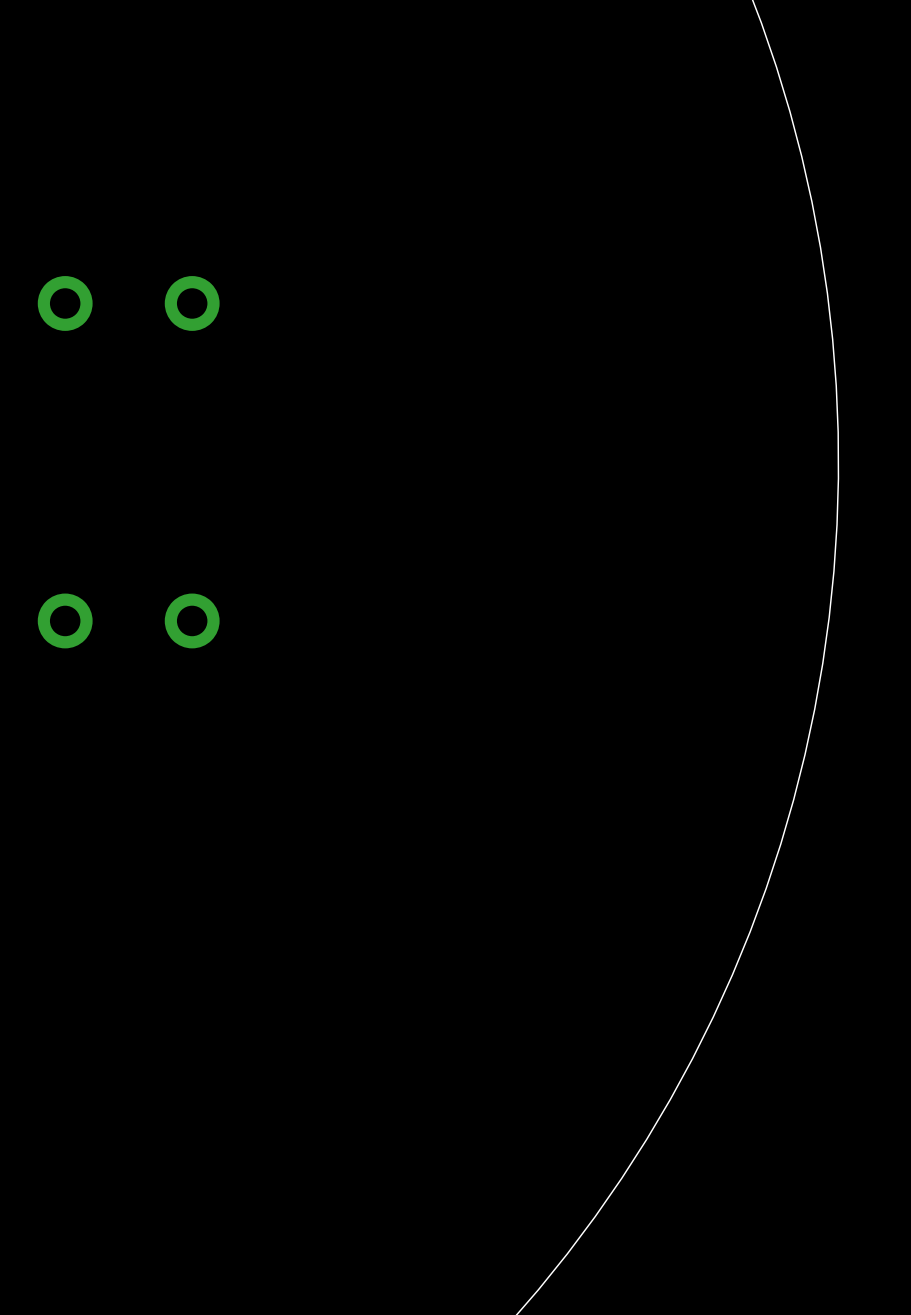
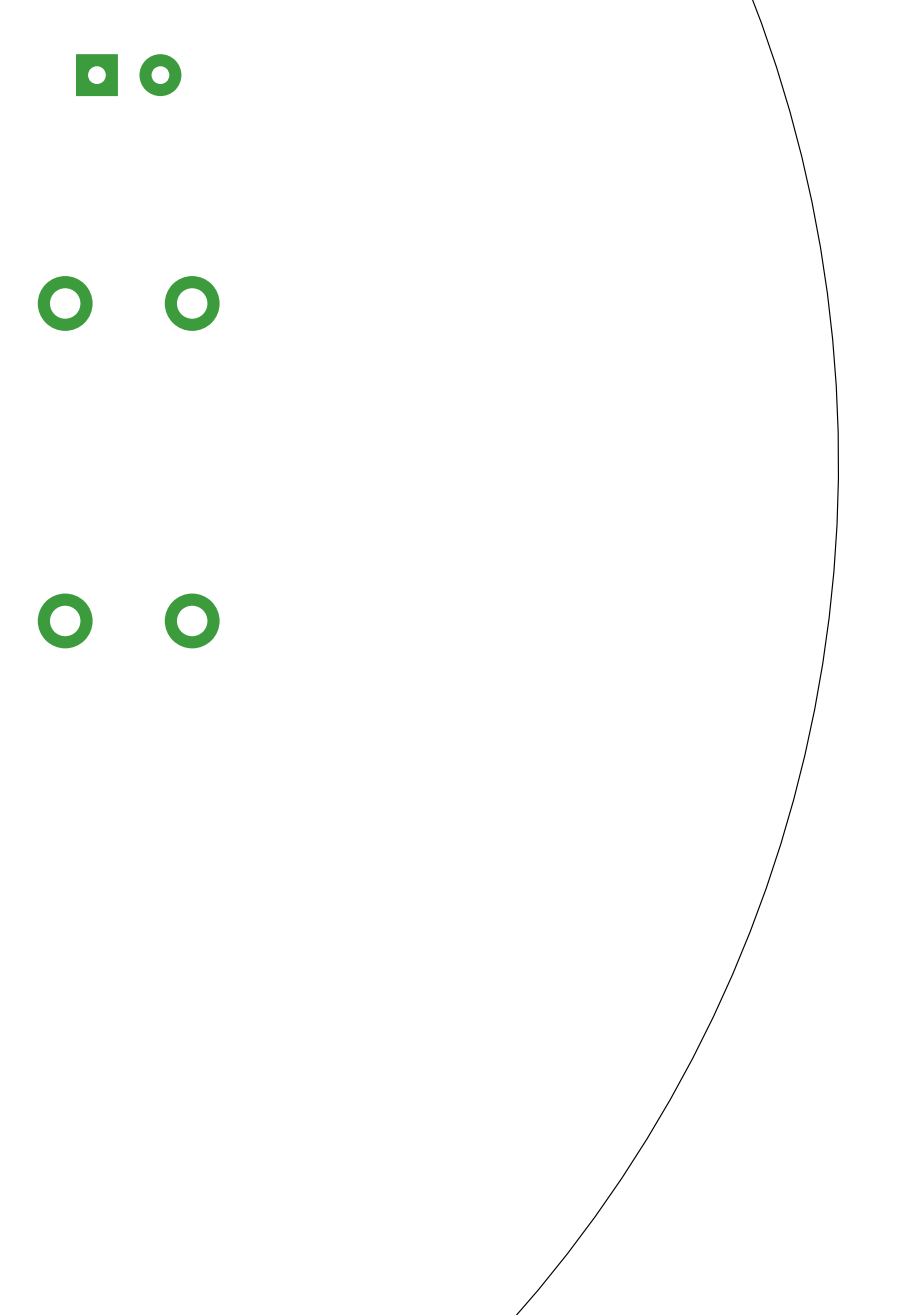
part: none -> (128, 75)

